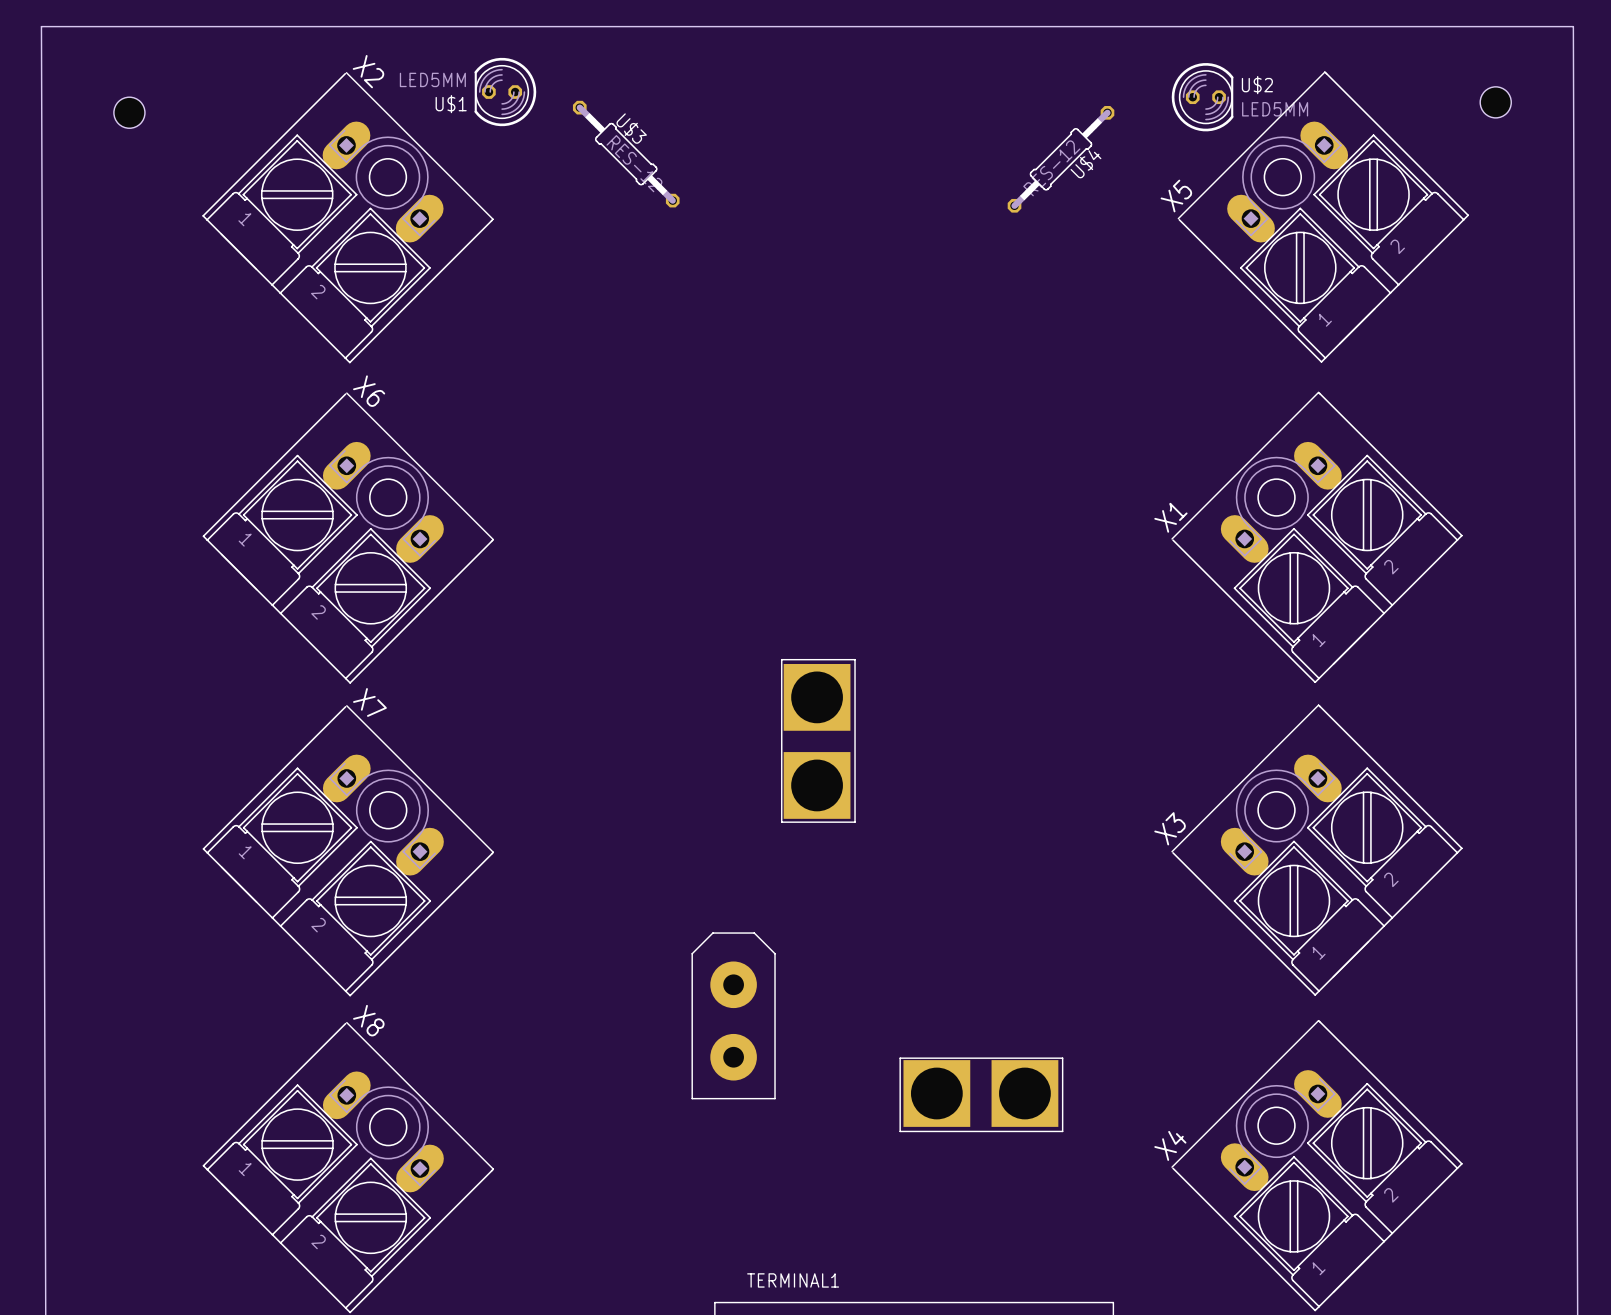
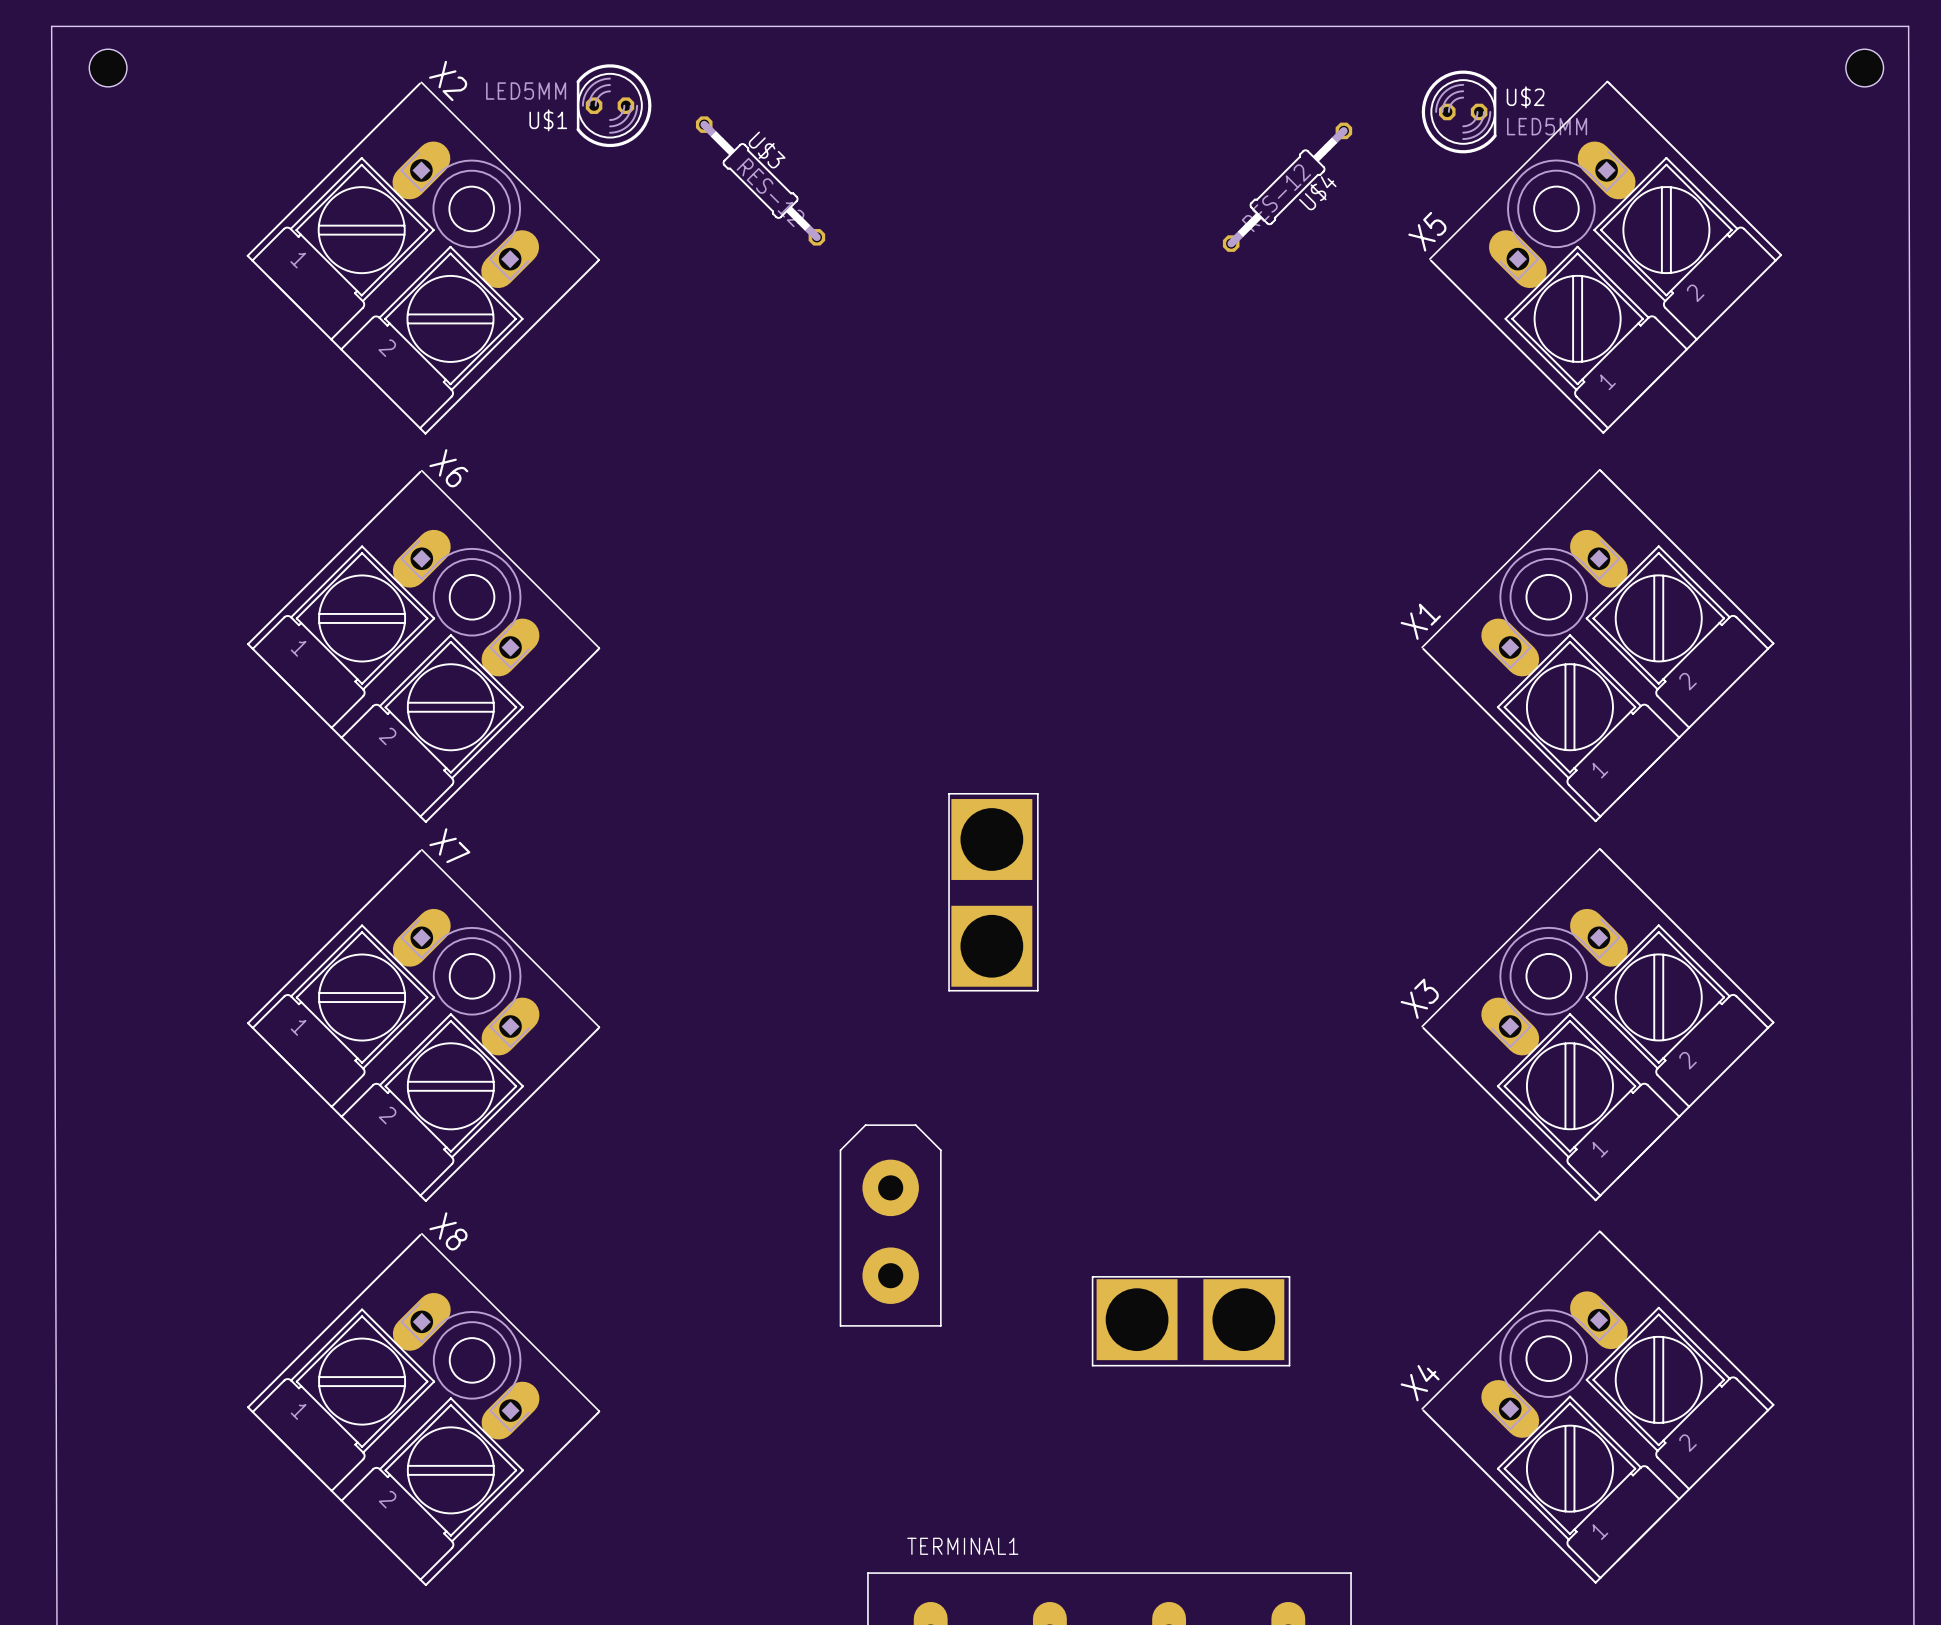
hole position: (1495, 102) -> (1864, 68)
hole position: (129, 112) -> (108, 68)

